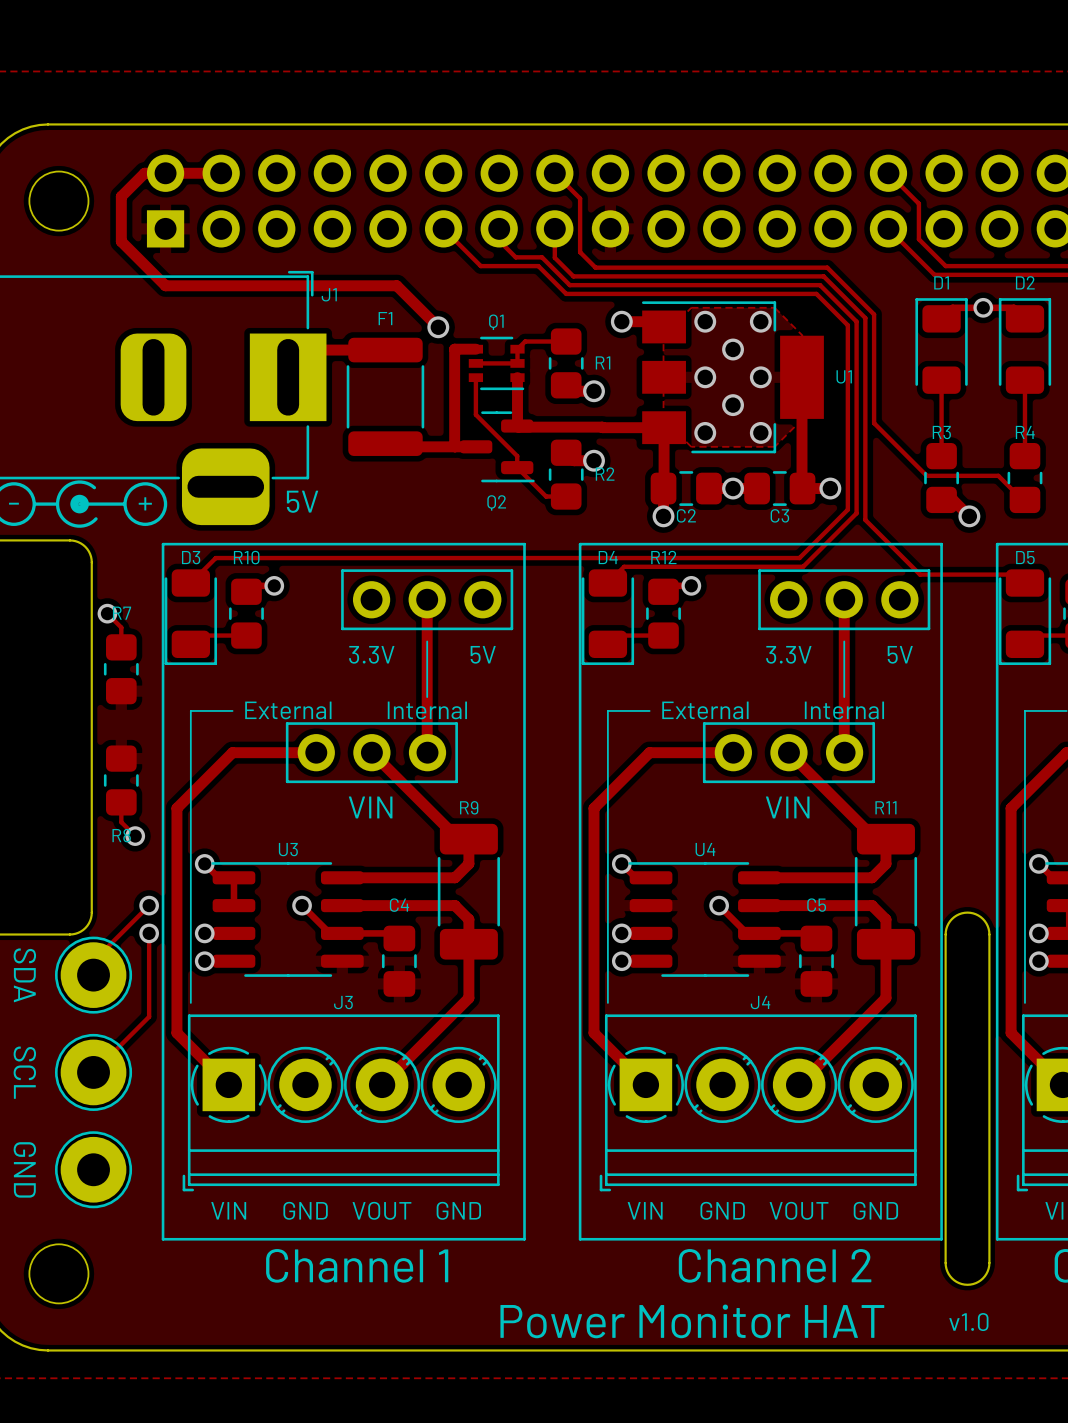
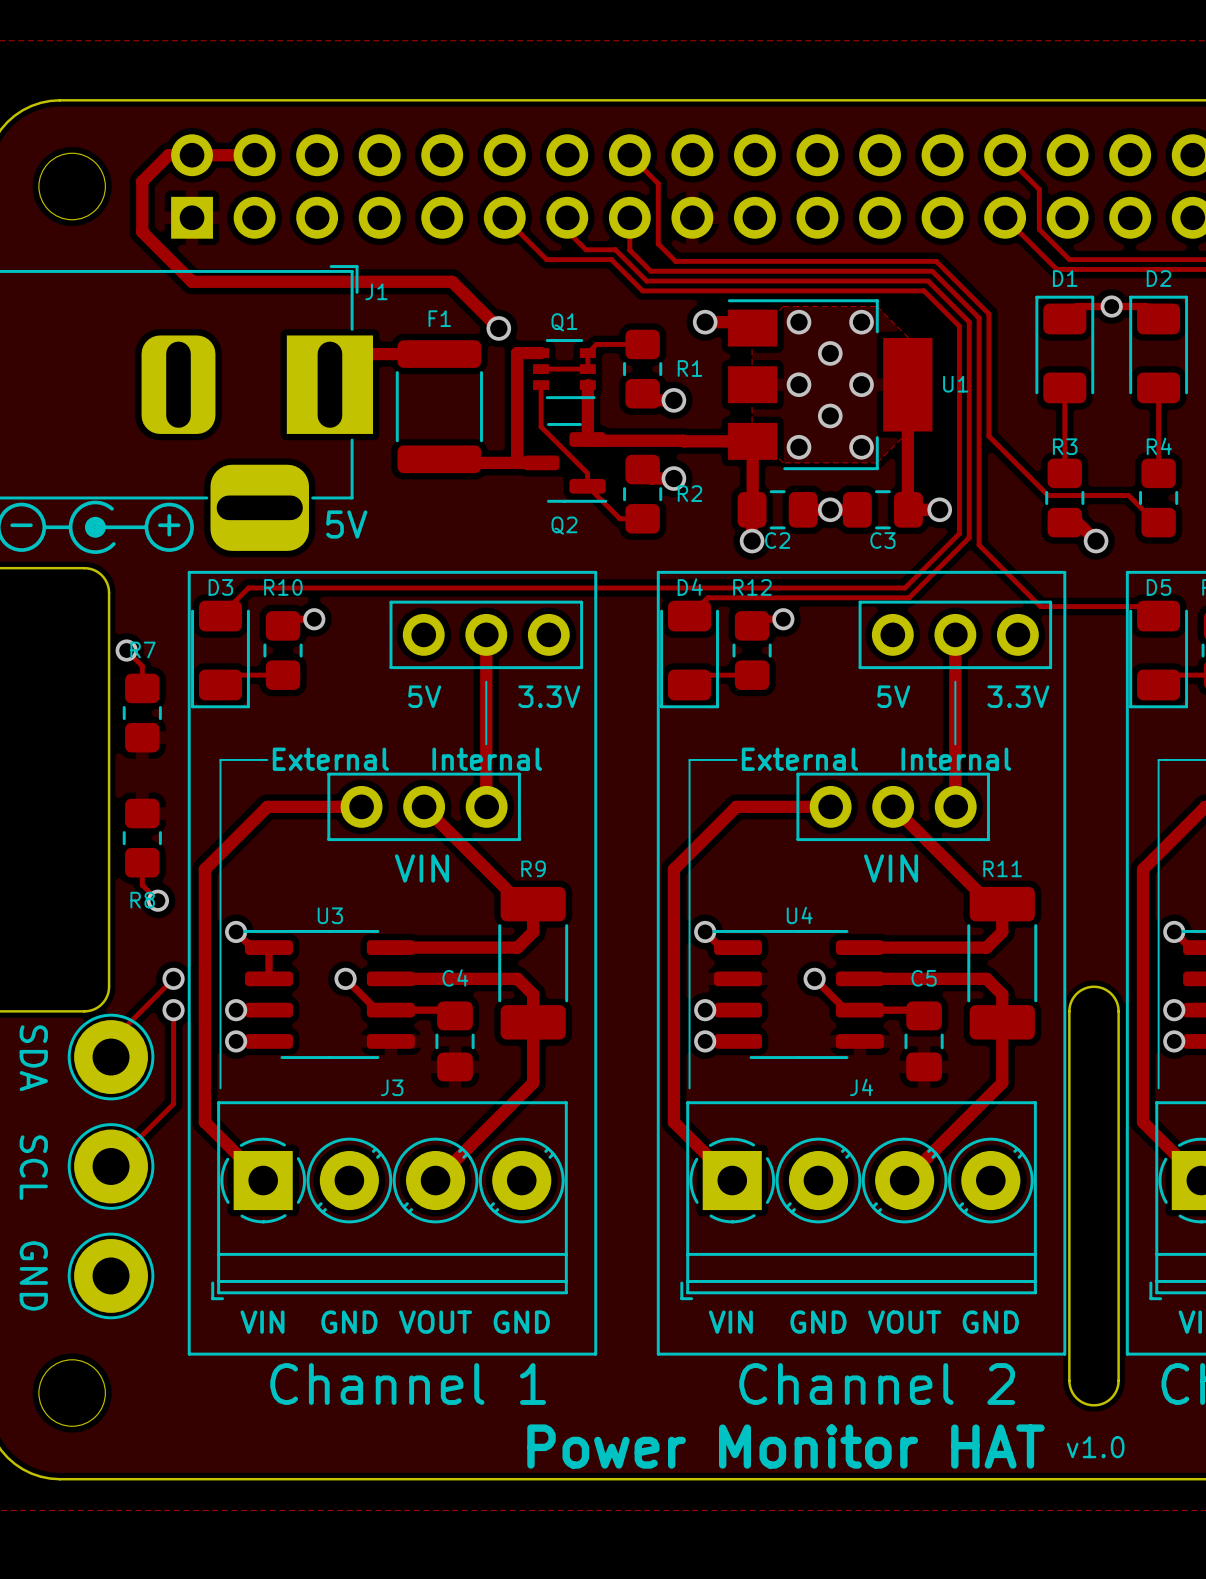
part text: 3.3V (371, 654) -> 5V (424, 696)
part text: 5V (483, 654) -> 3.3V (549, 696)
part text: 3.3V (788, 654) -> 5V (893, 696)
part text: 5V (900, 654) -> 3.3V (1018, 696)

